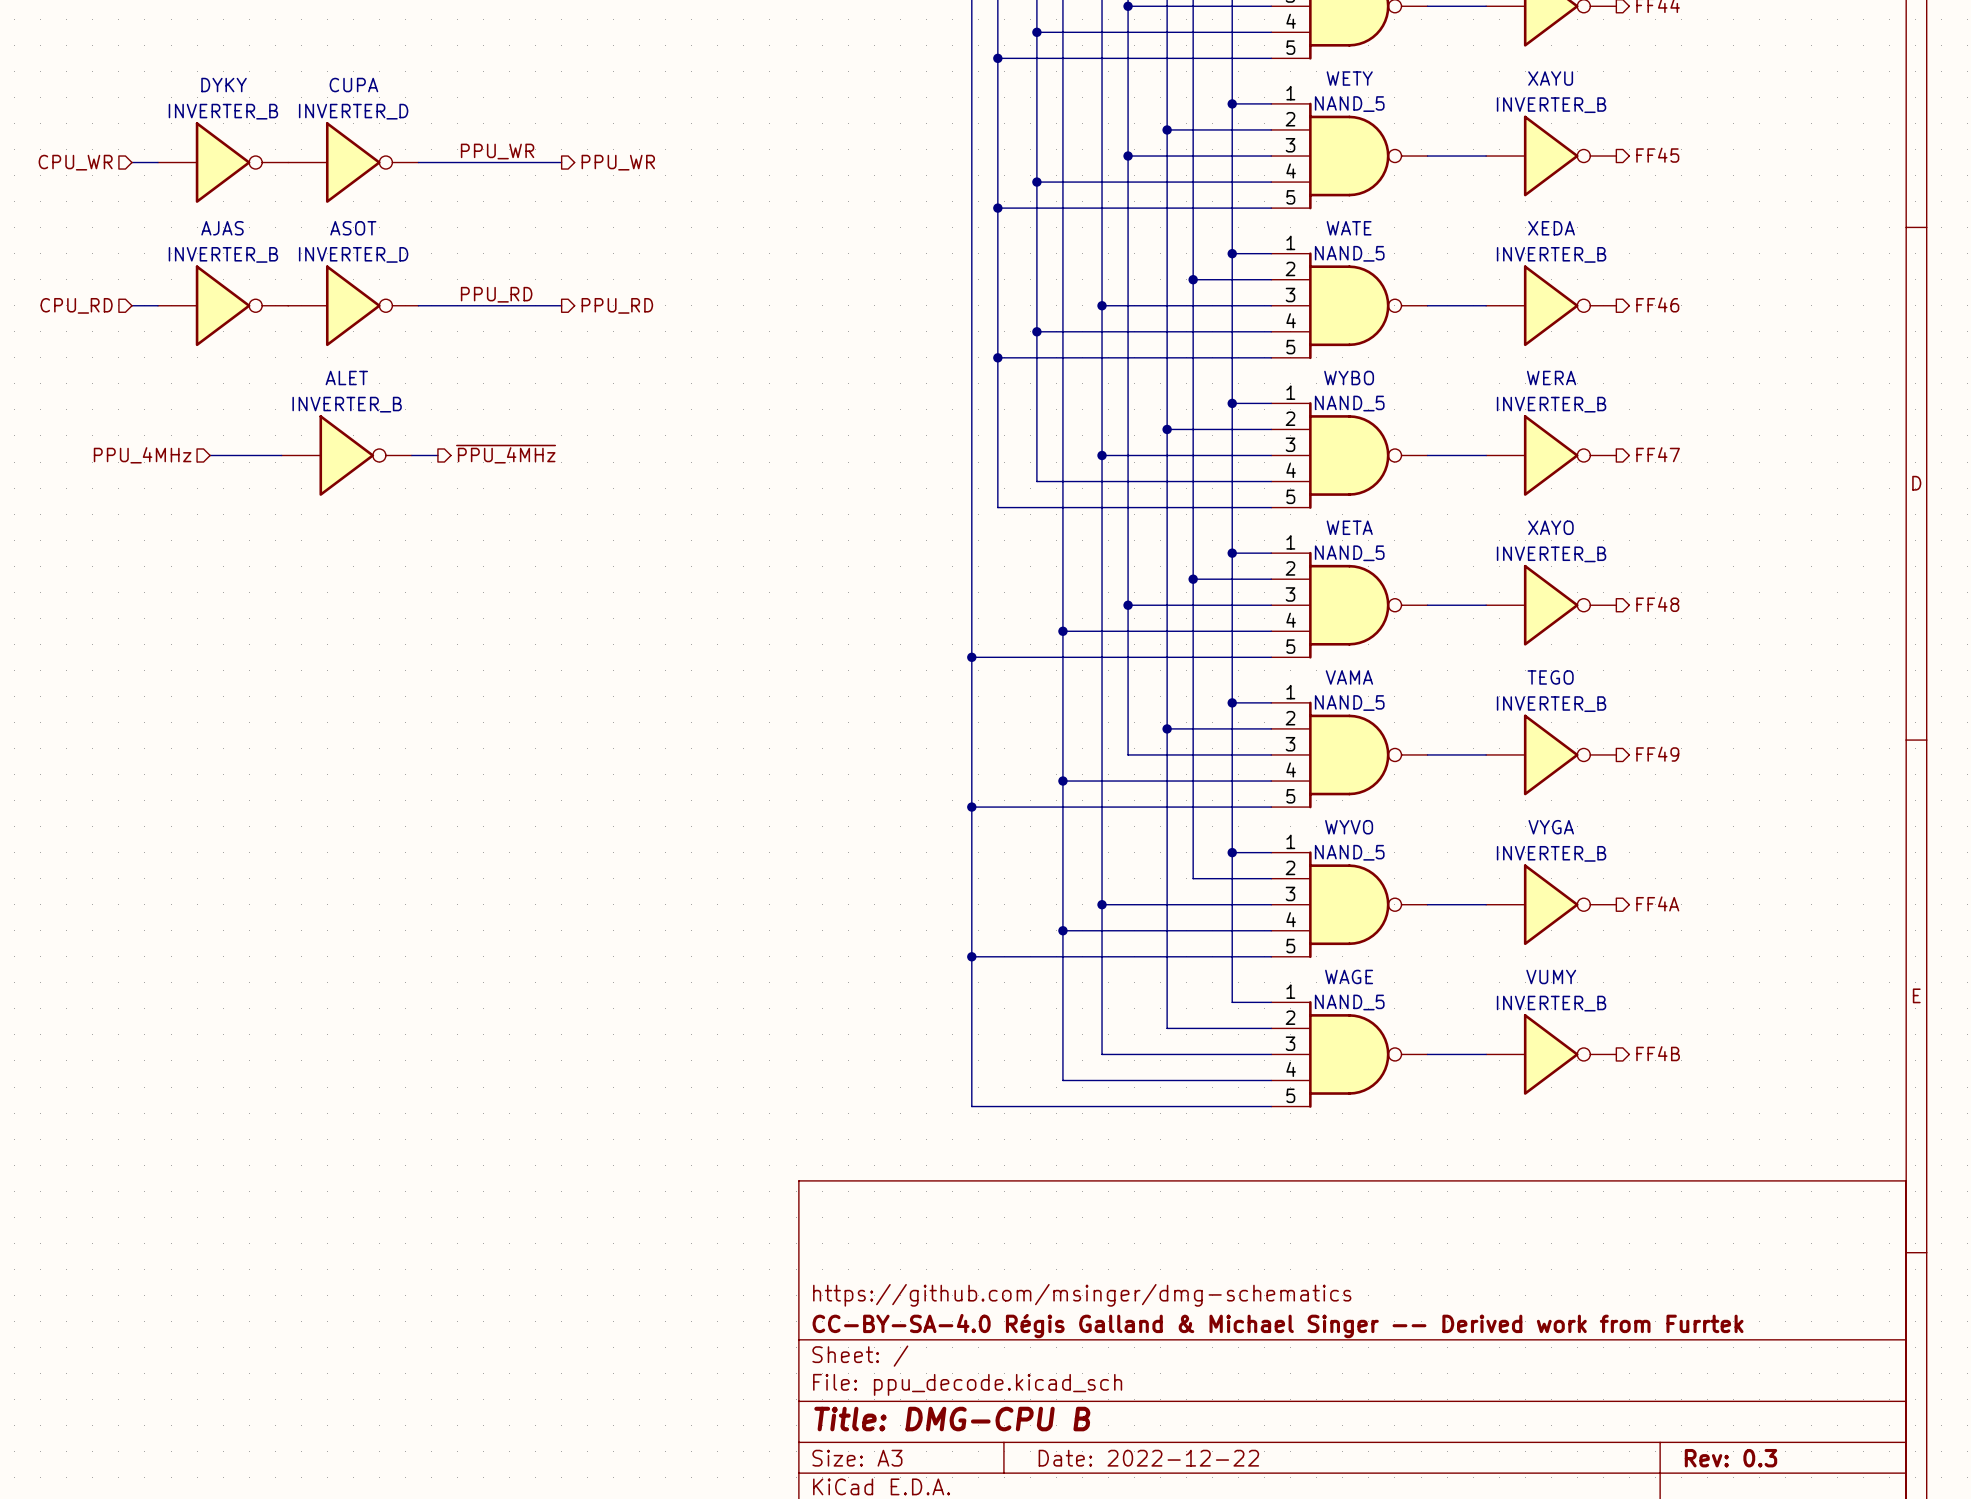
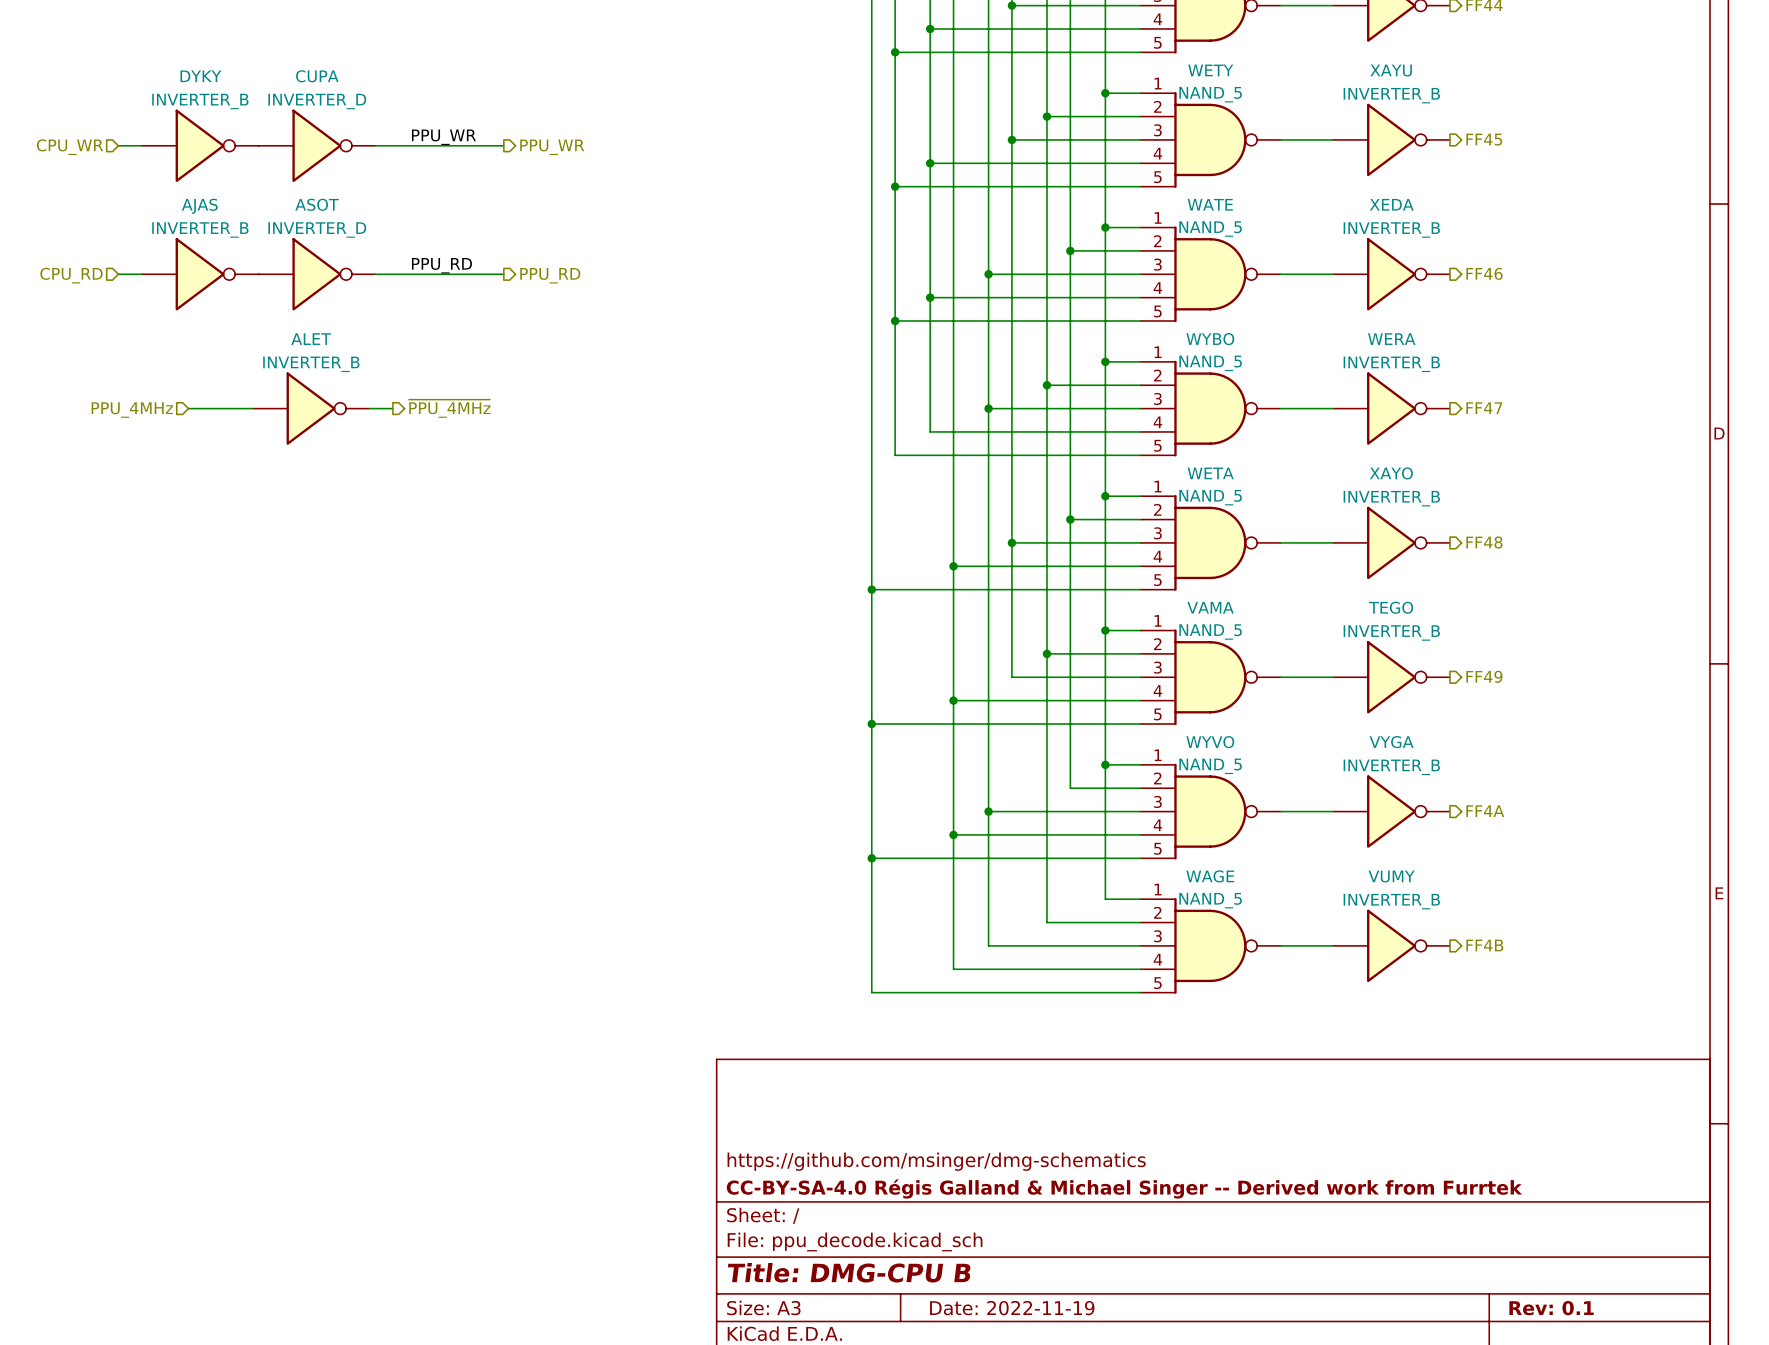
title block: Date: 2022-12-22 (1148, 1458) -> Date: 2022-11-19 (1012, 1308)
title block: Rev: 0.3 (1730, 1458) -> Rev: 0.1 (1551, 1308)

